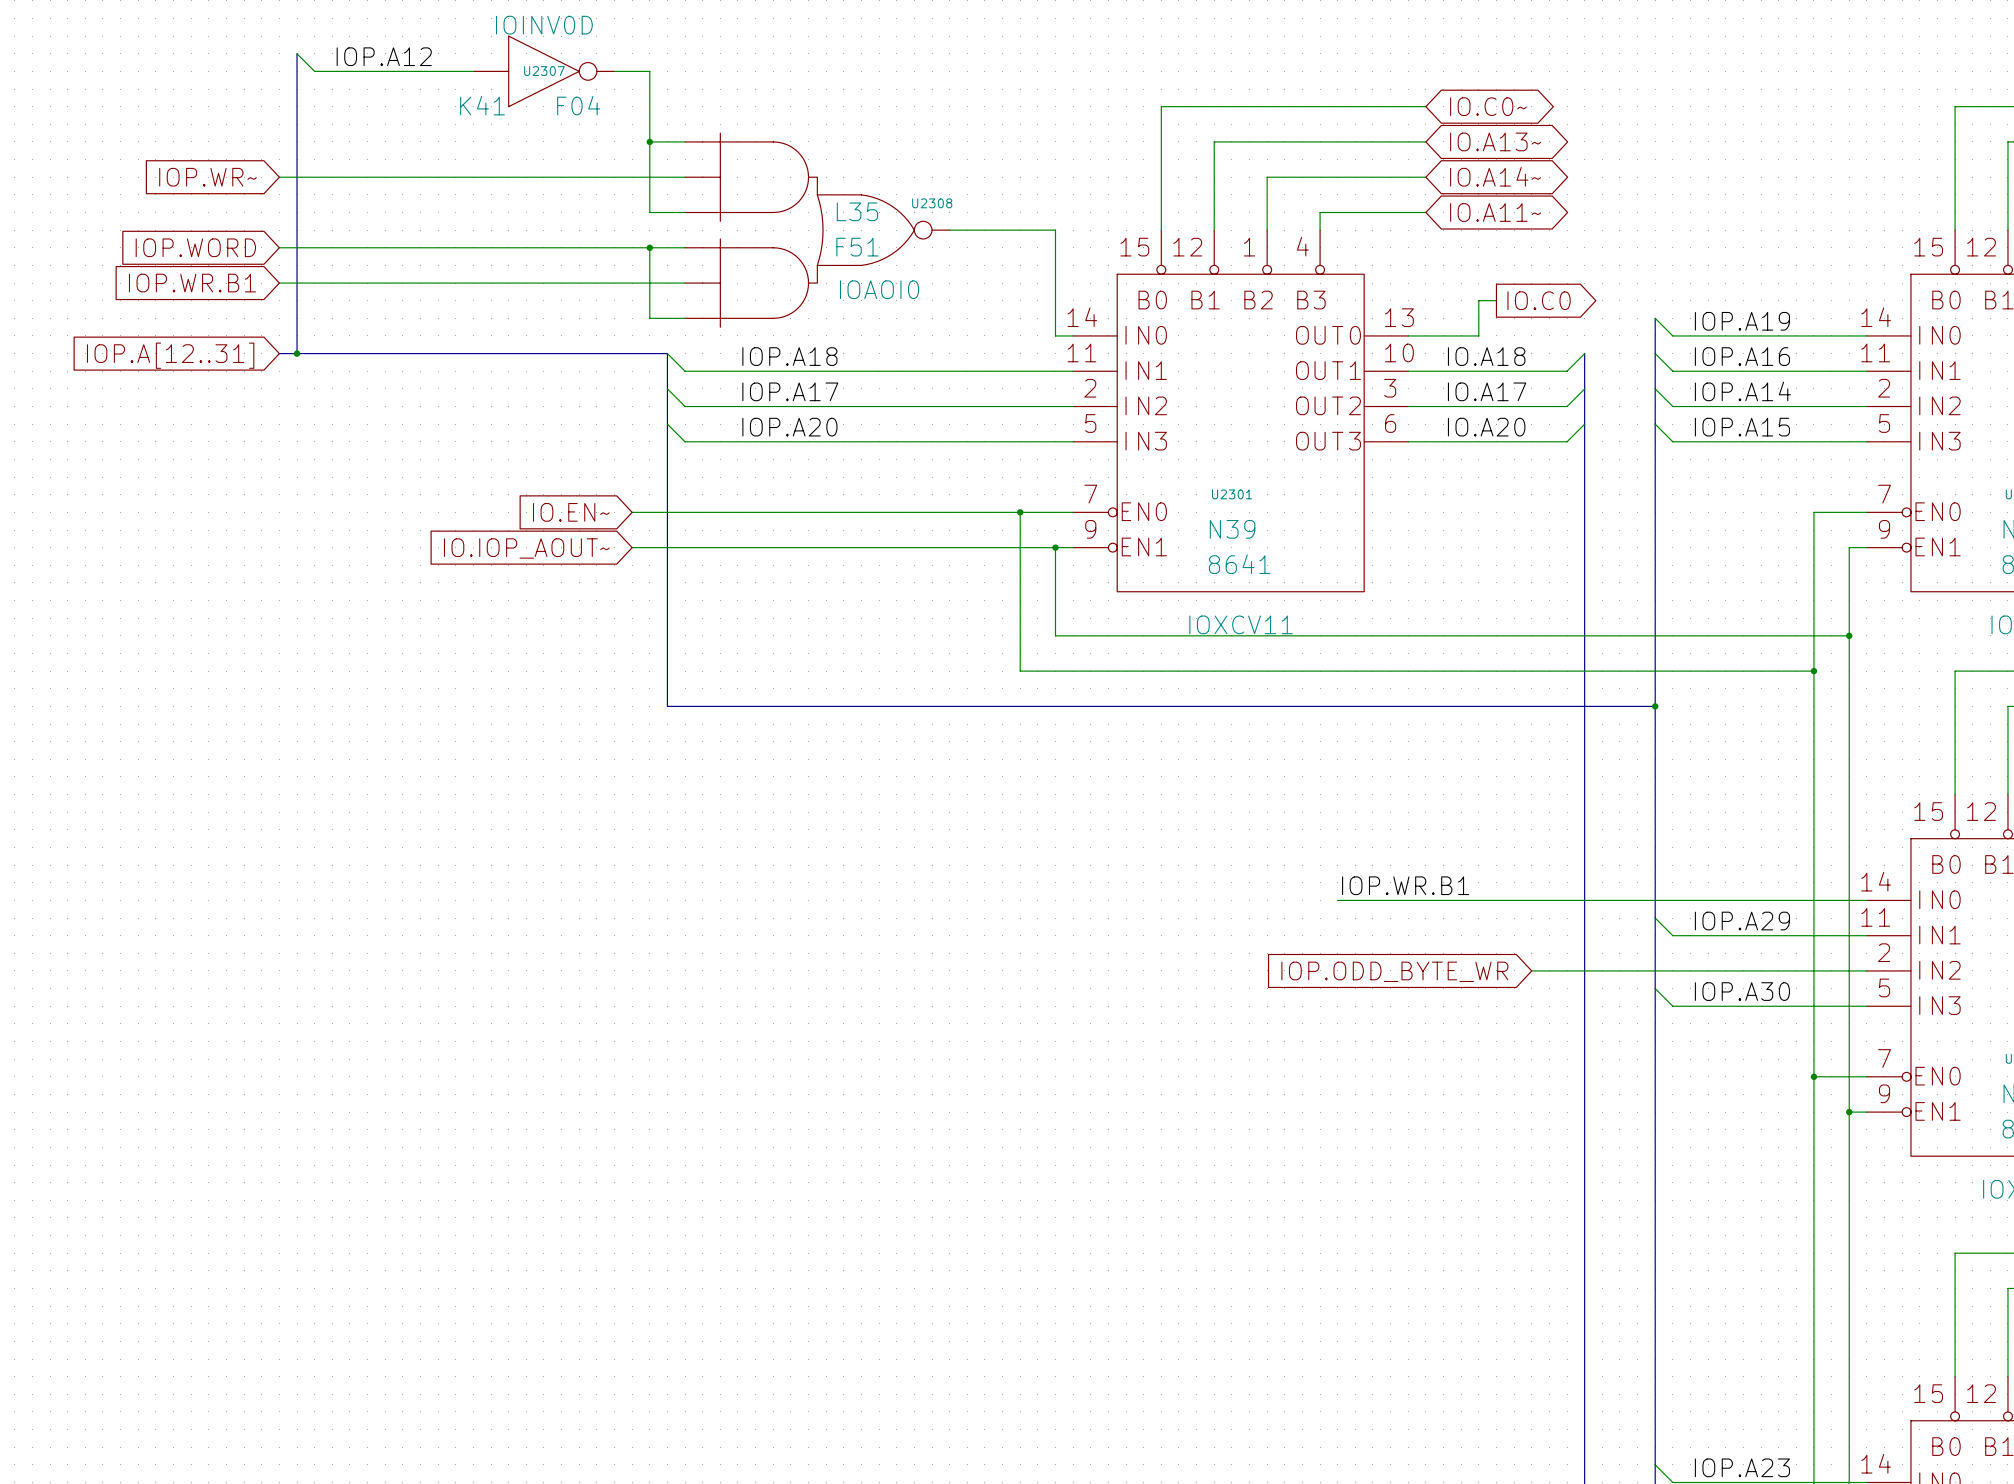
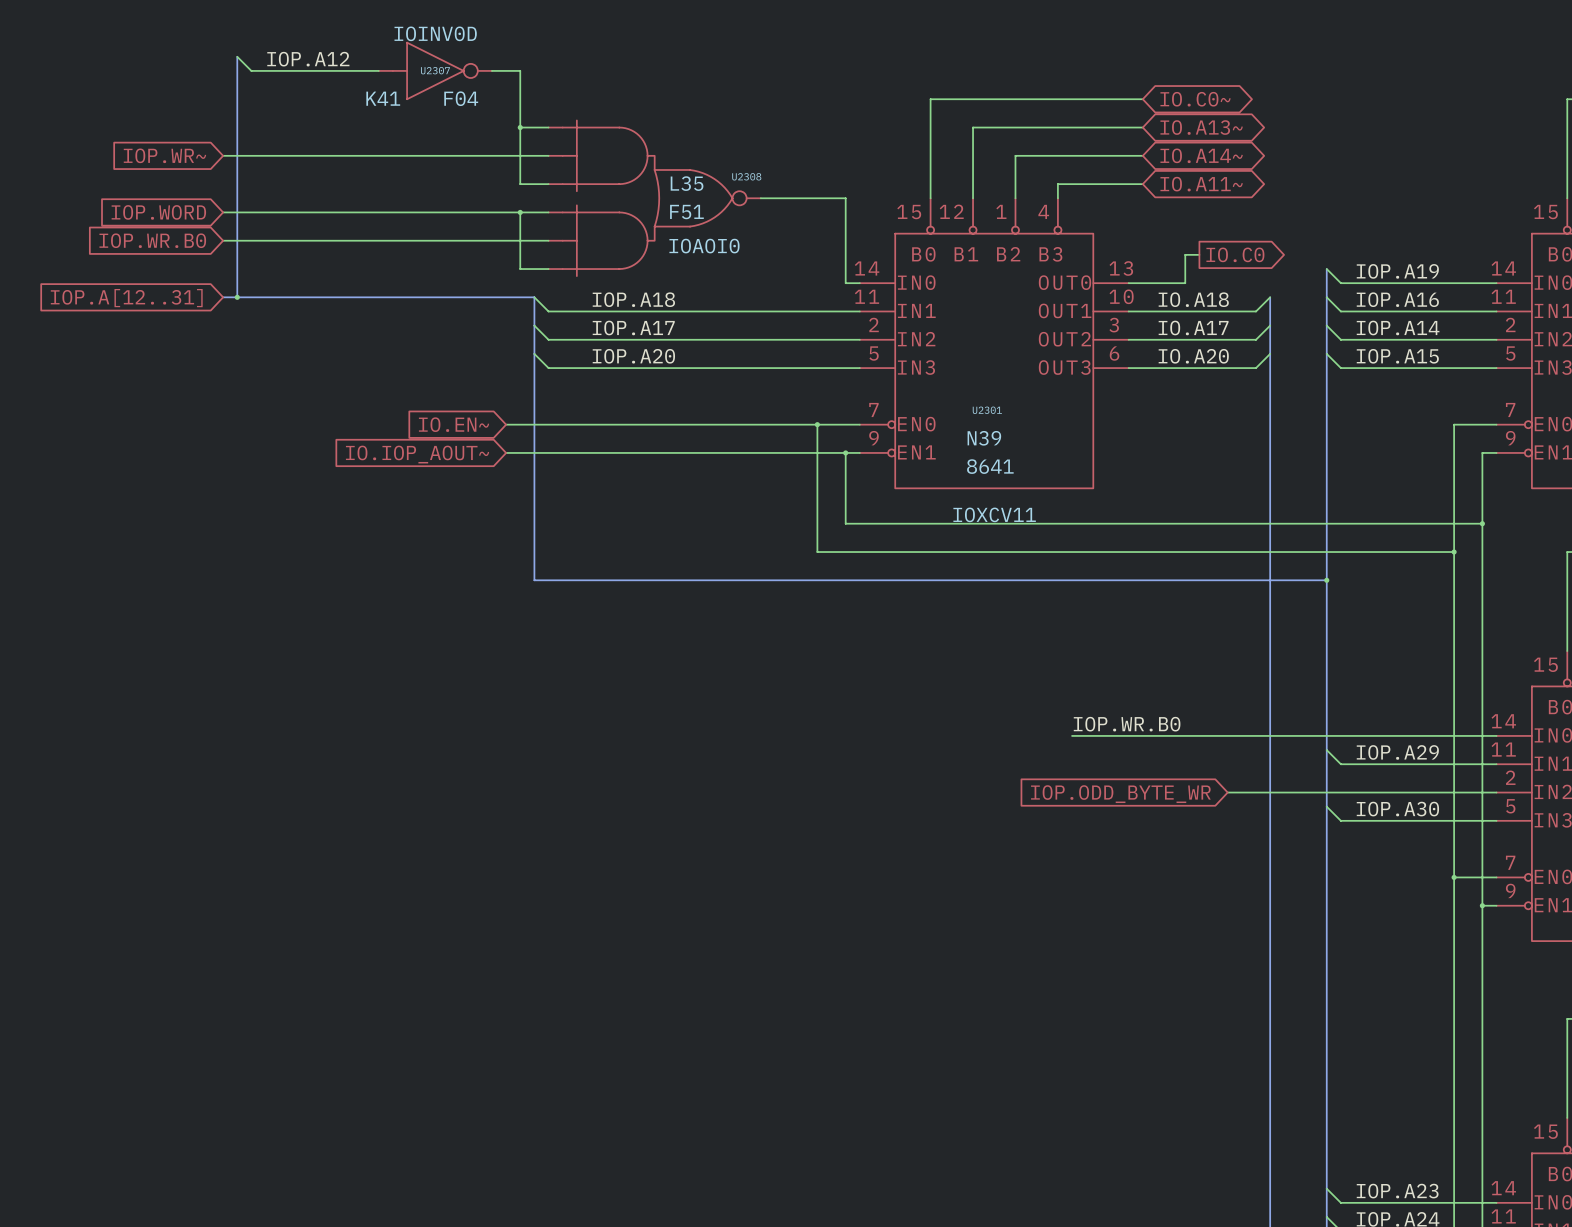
global label: IOP.WR.B1 (192, 283) -> IOP.WR.B0 (152, 240)
label: IOP.WR.B1 (1405, 885) -> IOP.WR.B0 (1127, 724)

